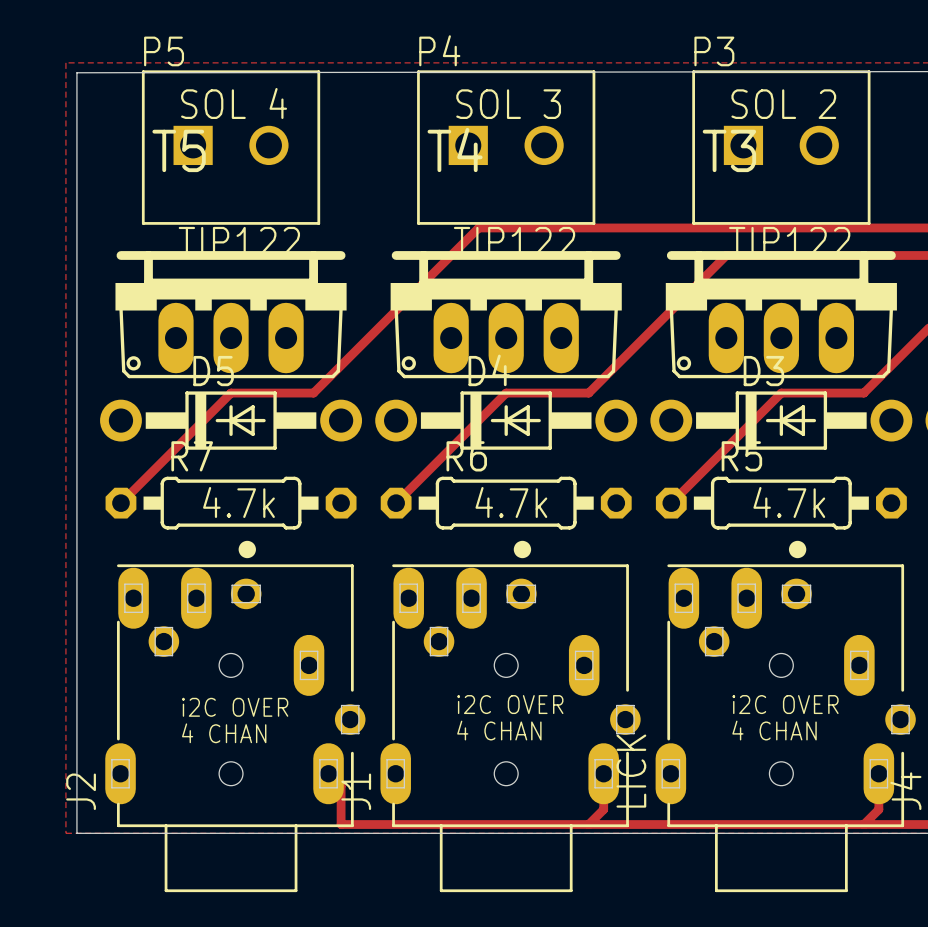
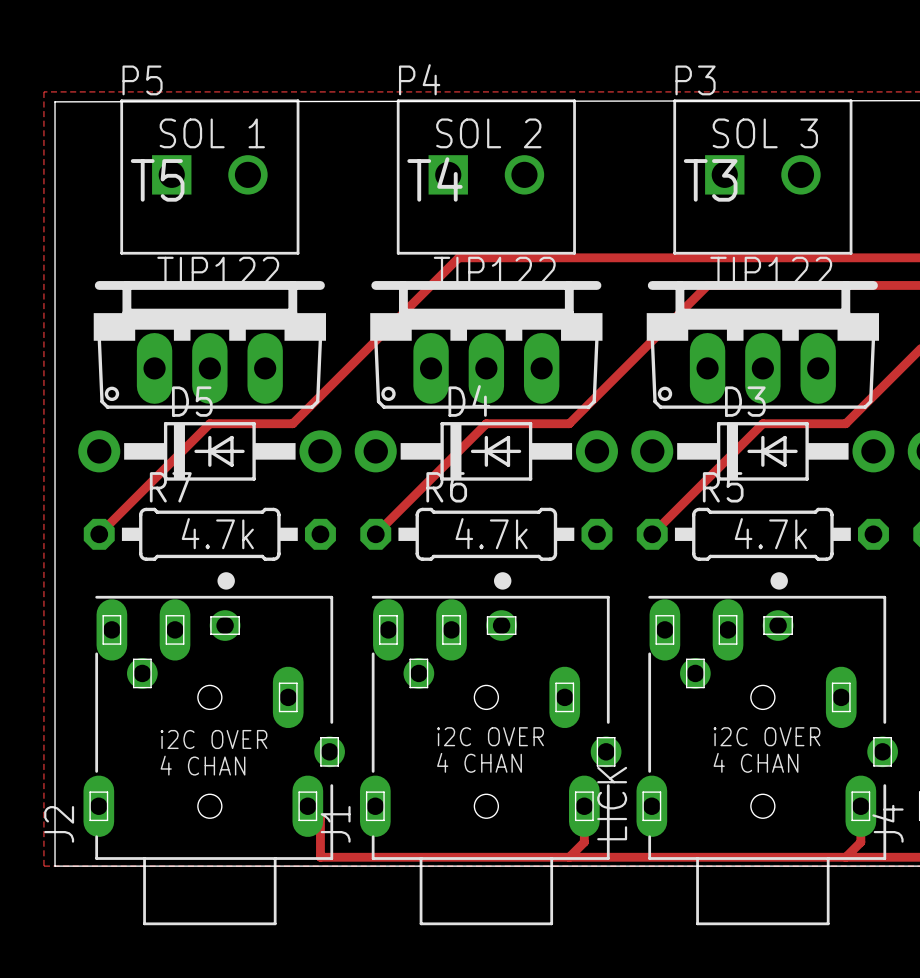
text: SOL 4 (234, 103) -> SOL 1 (212, 133)
text: SOL 3 (508, 104) -> SOL 2 (488, 133)
text: SOL 2 (783, 104) -> SOL 3 (765, 133)

